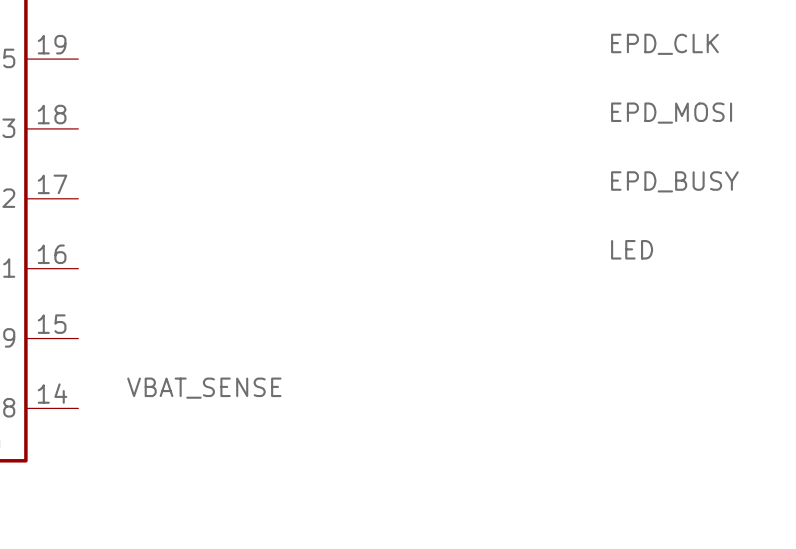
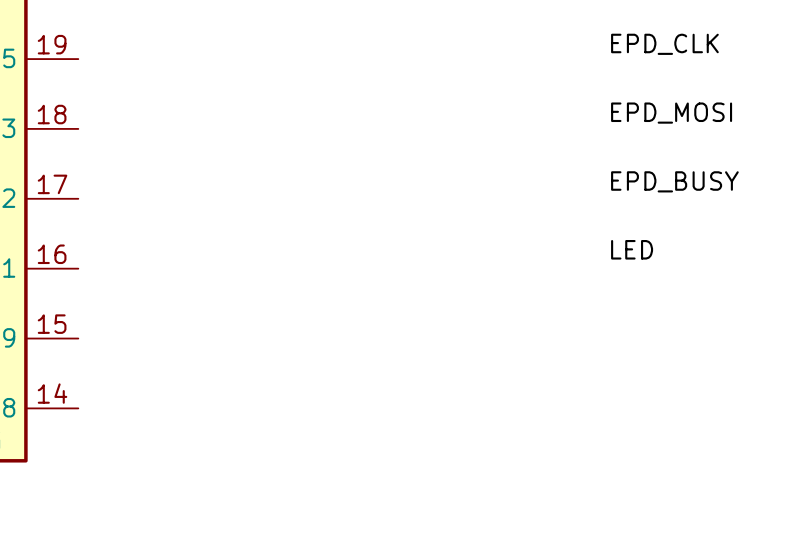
label: VBAT_SENSE (204, 388) -> none

